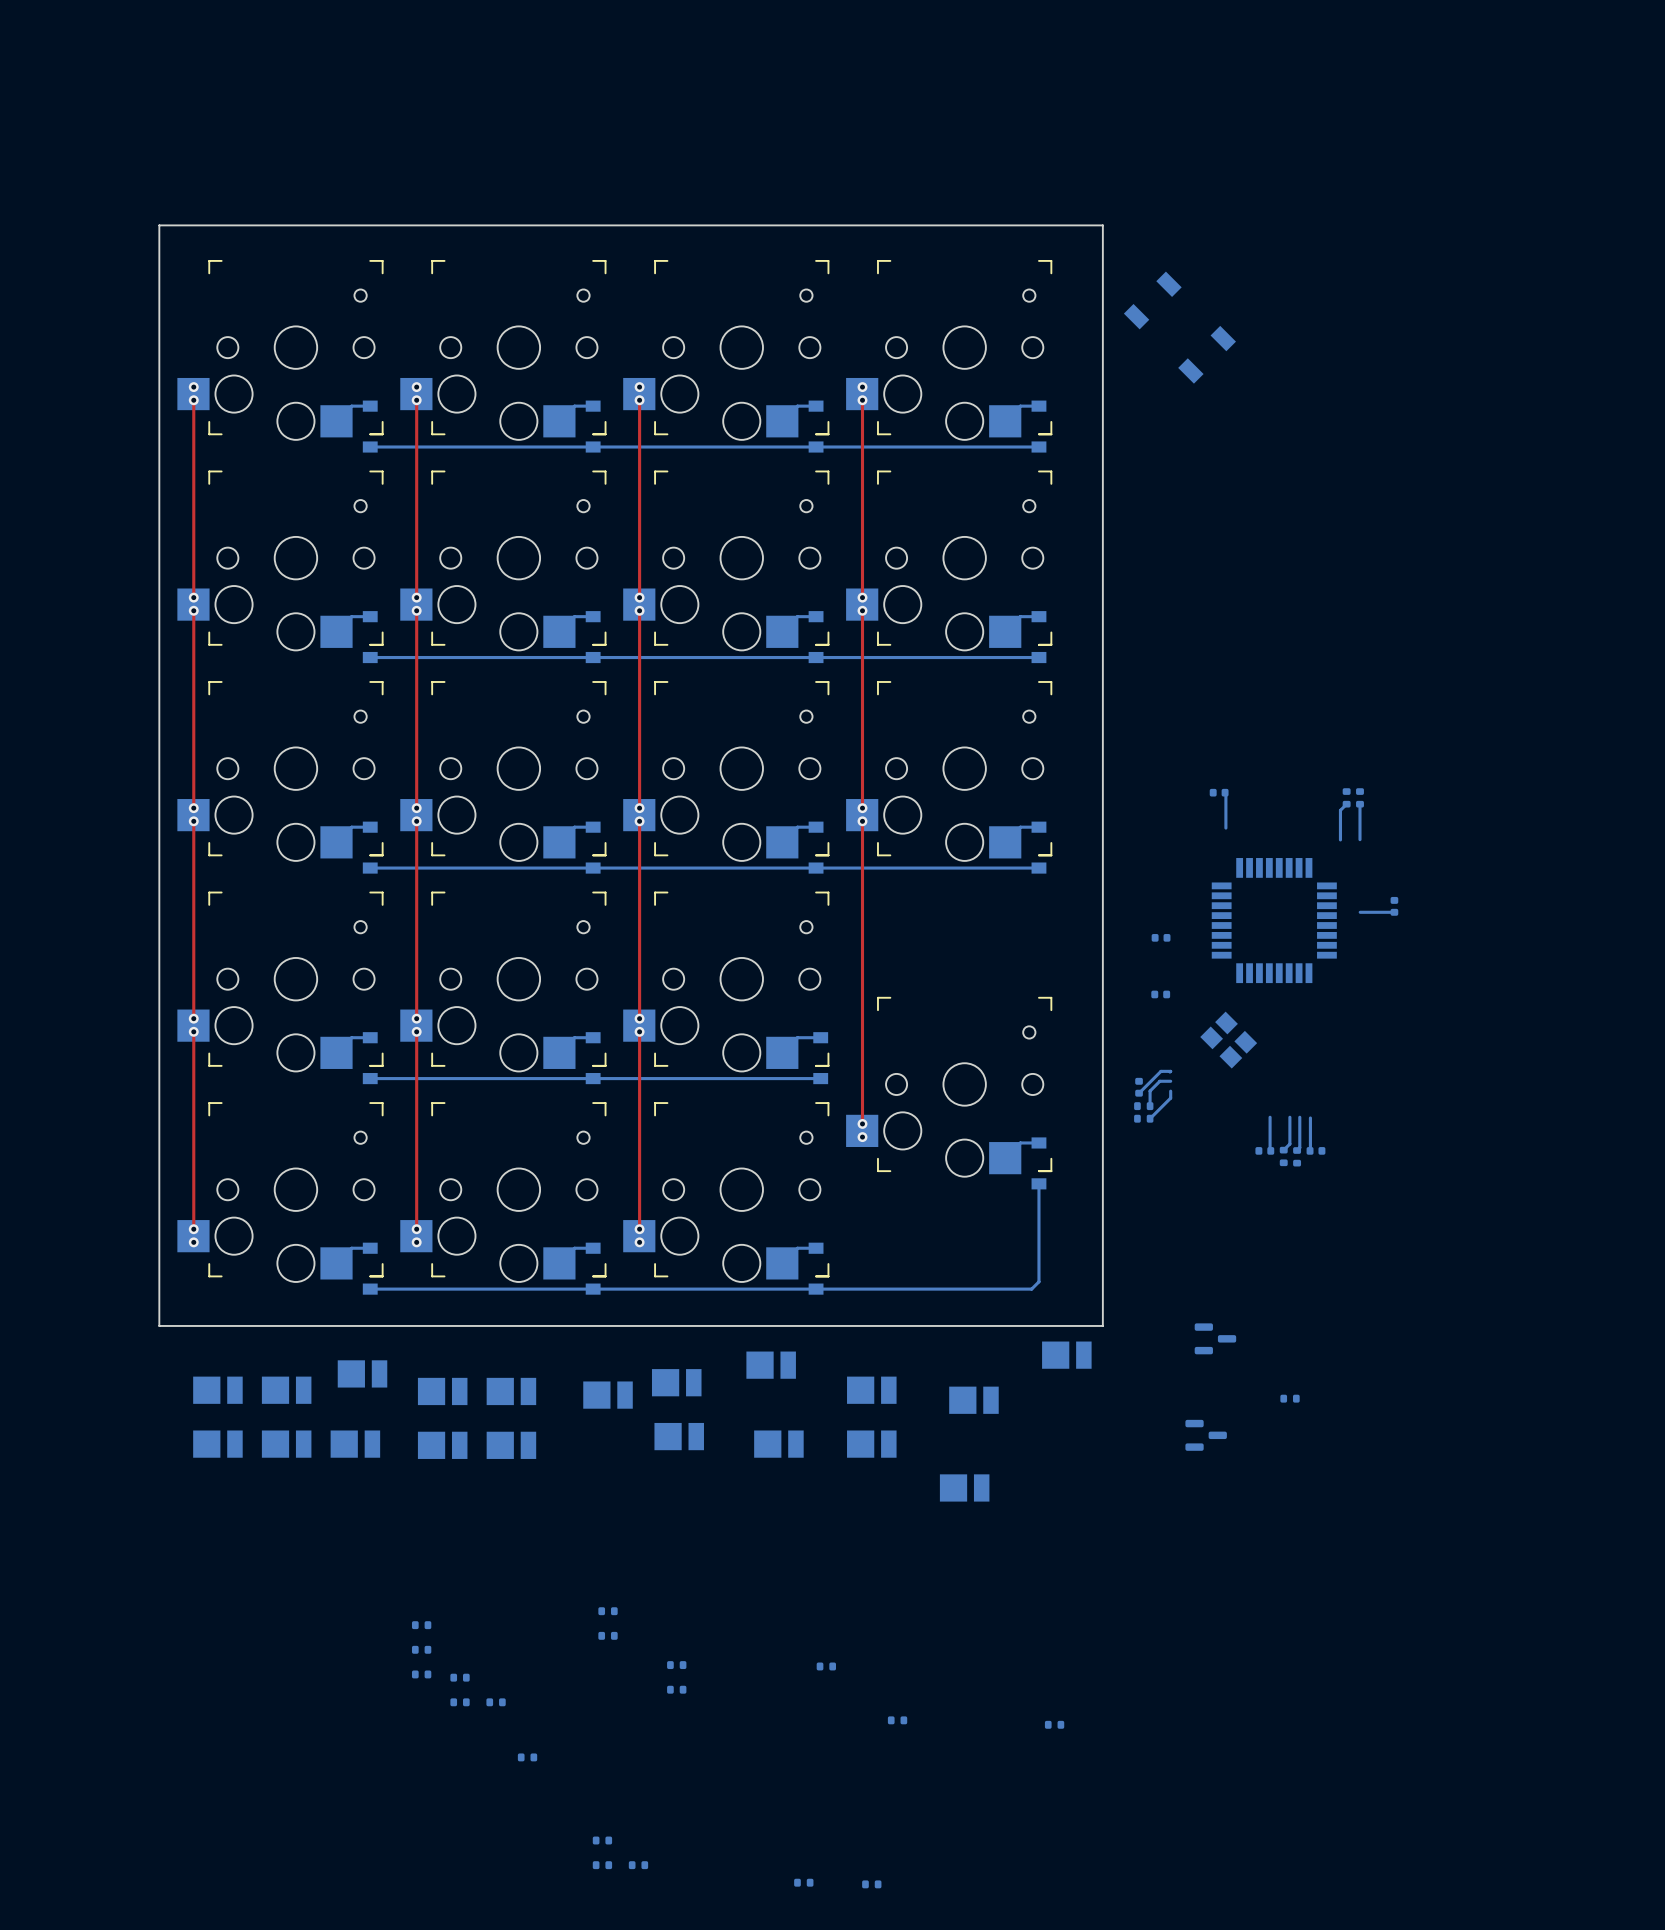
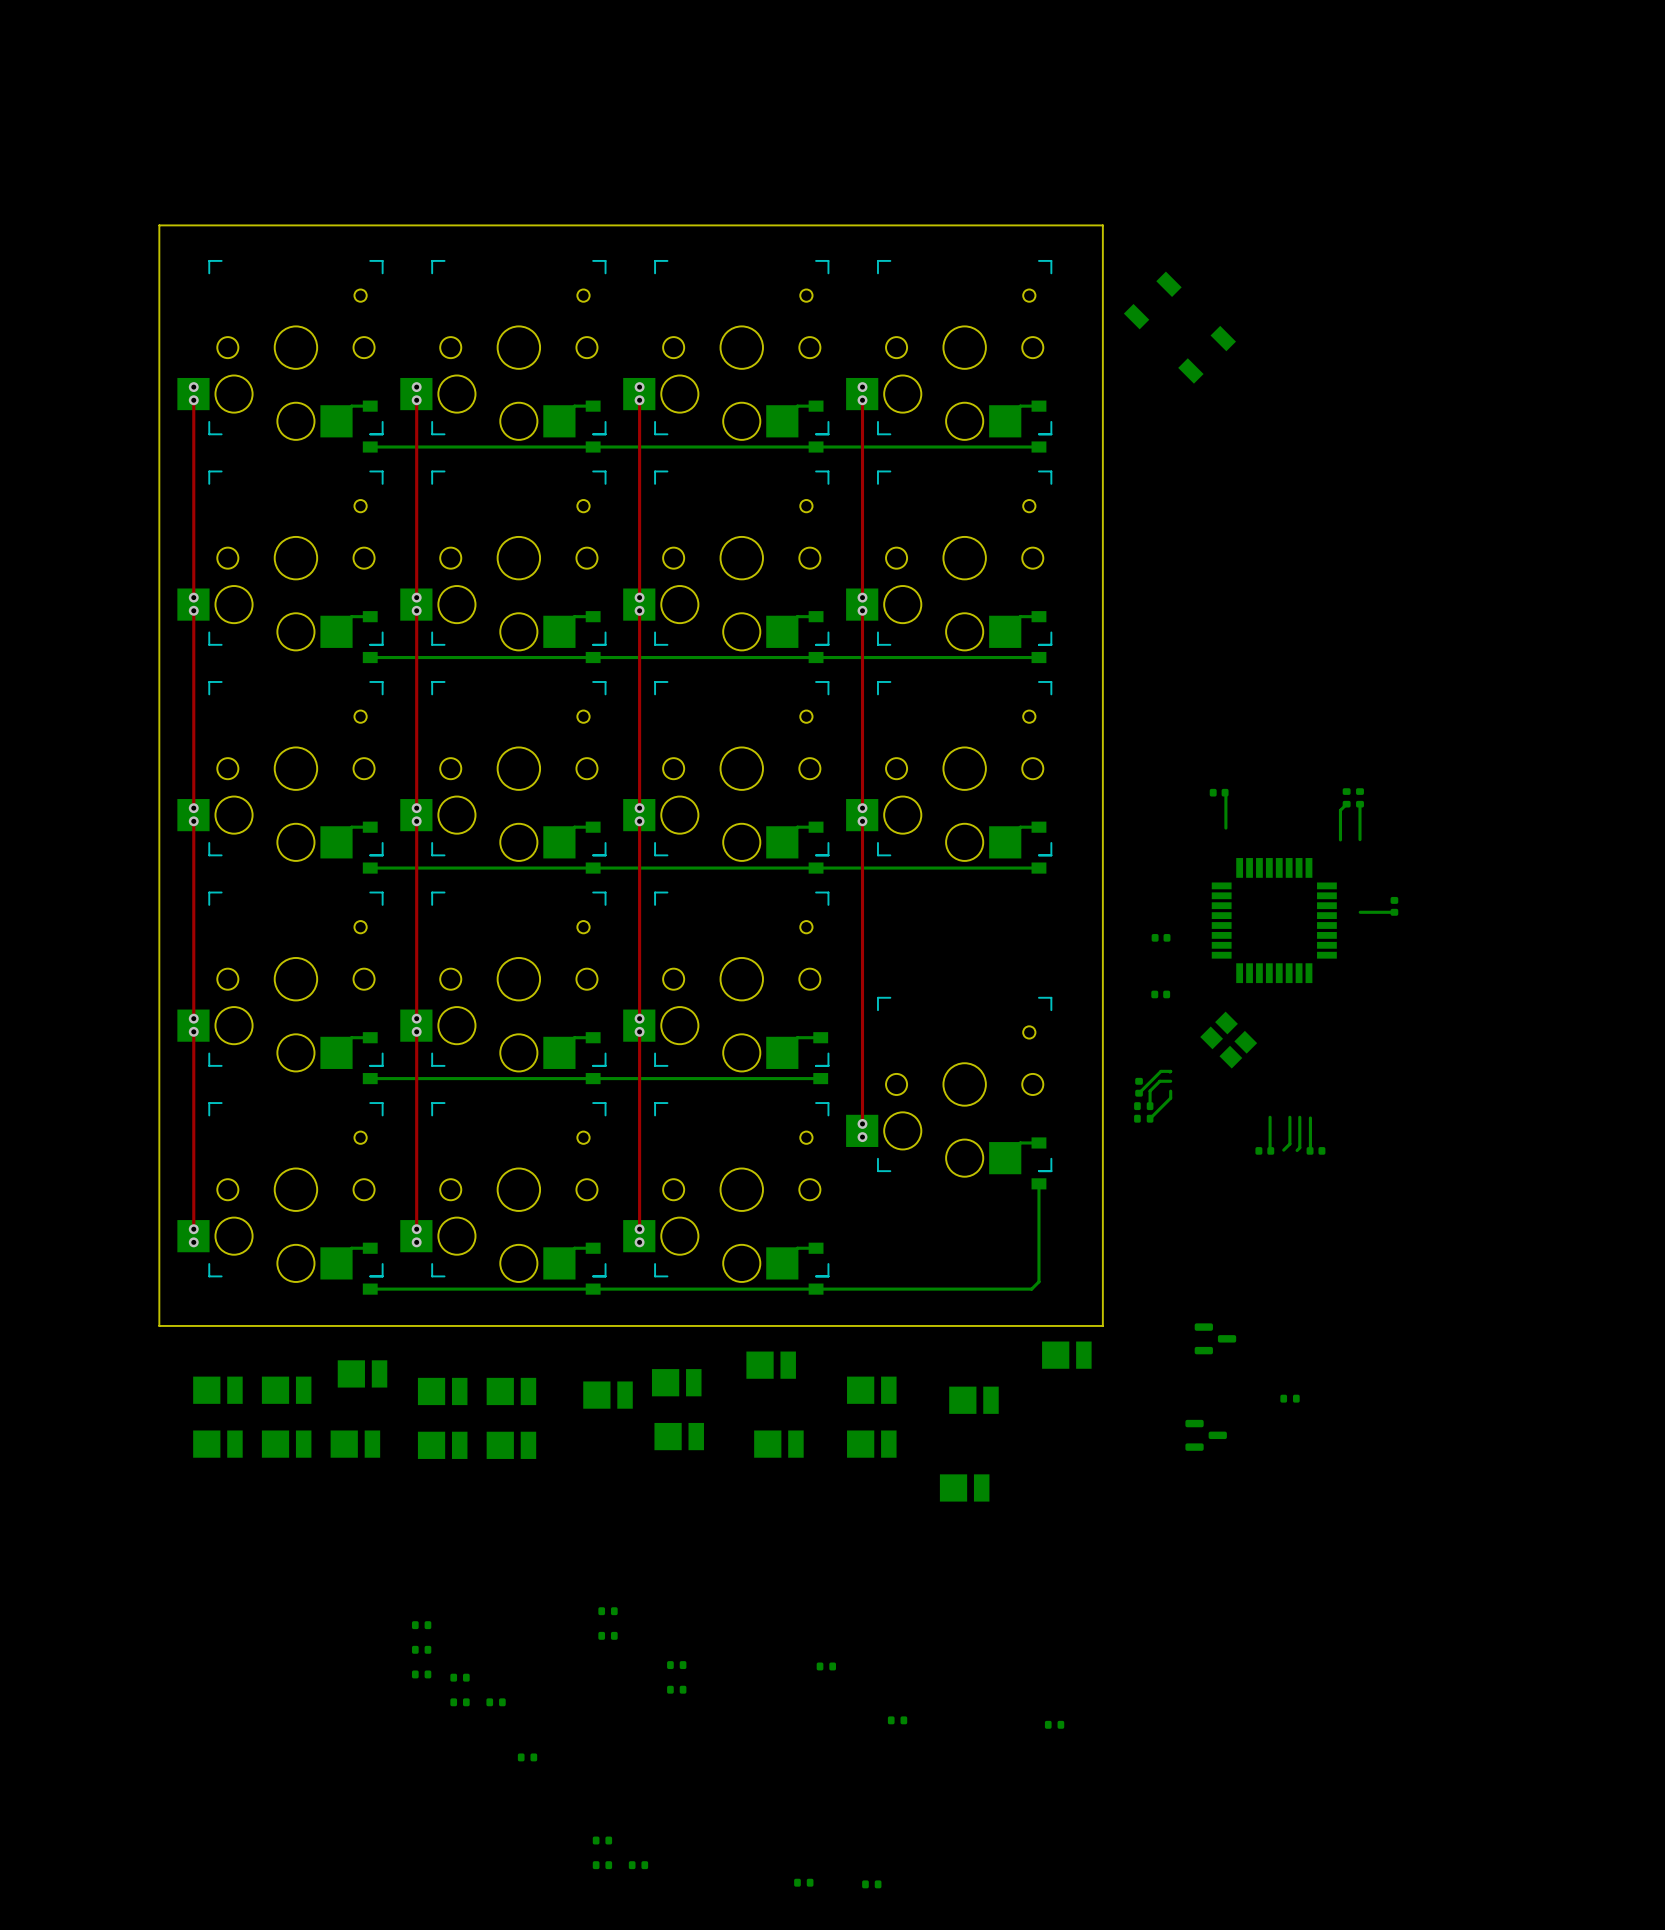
part: (1283, 1156) -> none
part: (1297, 1156) -> none

